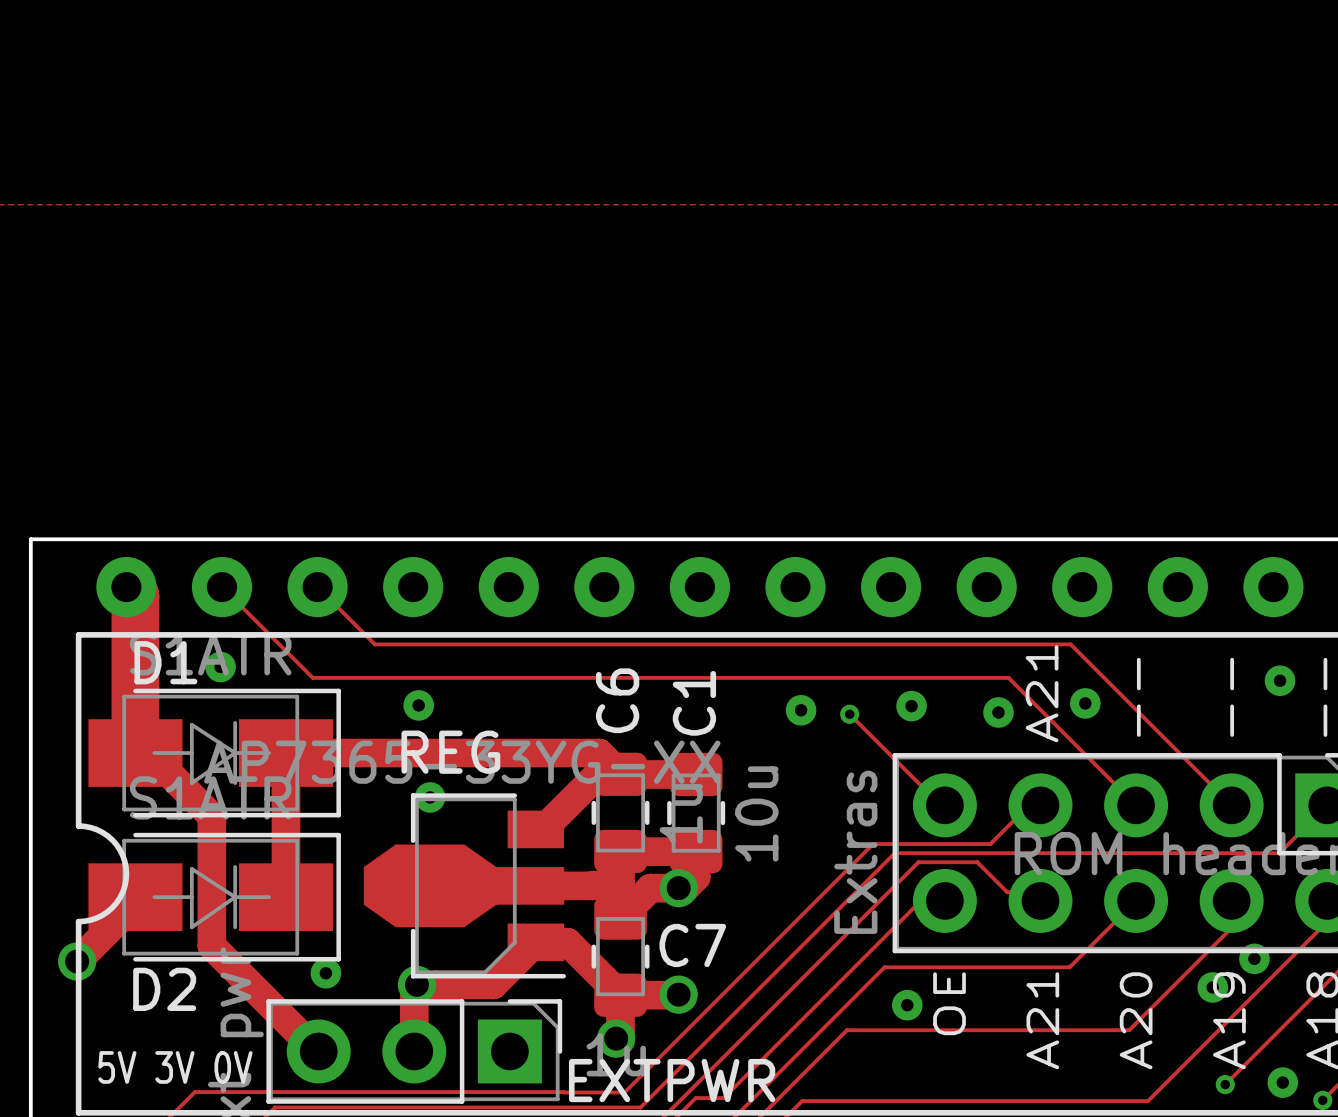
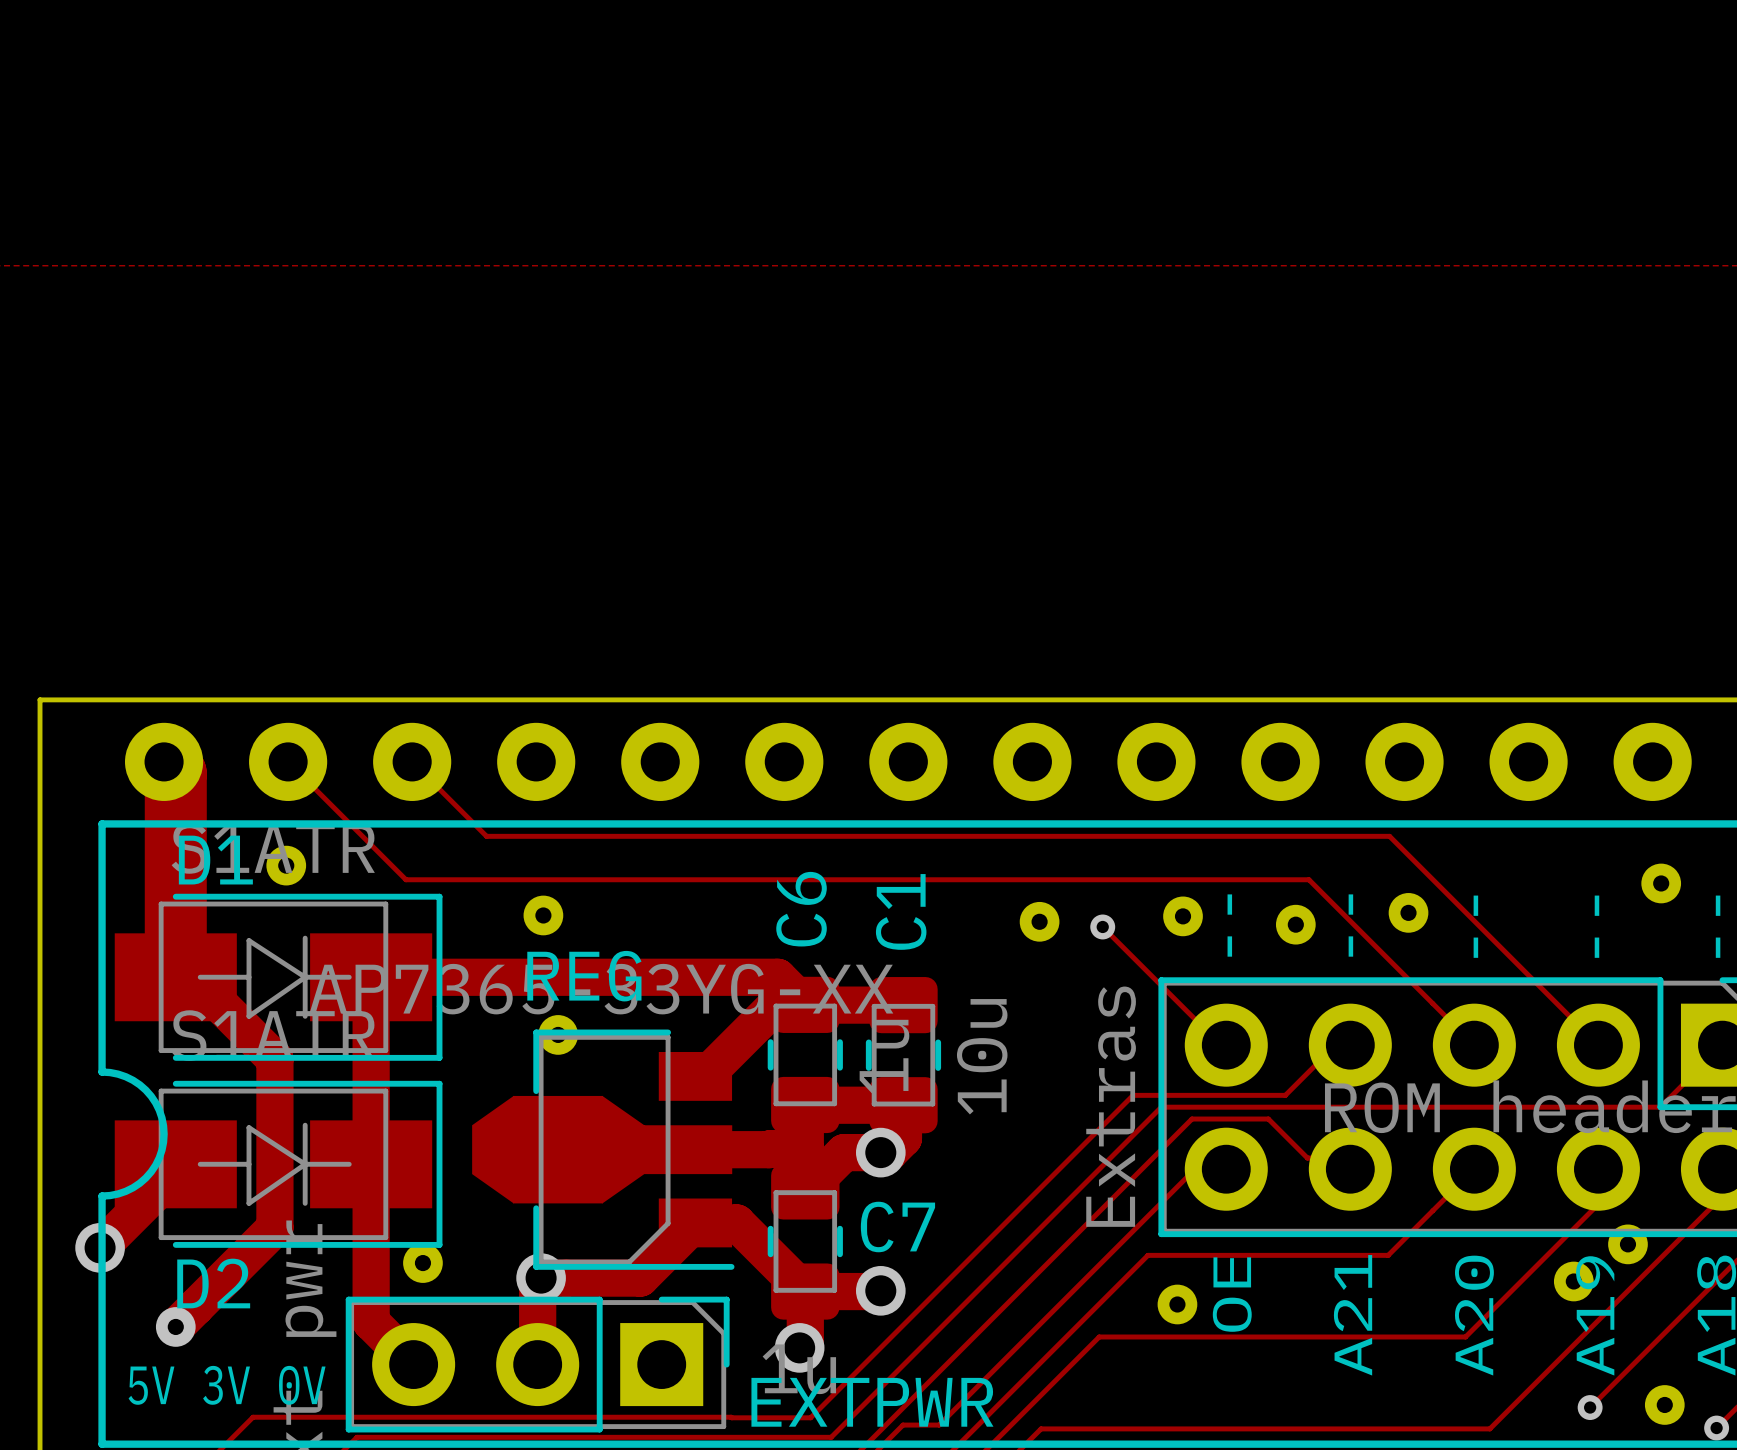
text: A21 (1042, 693) -> -- (1350, 925)
text: none -> -- (1229, 925)
track: (211, 946) (317, 1051) -> (371, 1164) (371, 1322) (413, 1364)
track: none -> (274, 1227) (175, 1326)
via: none -> (175, 1326)

